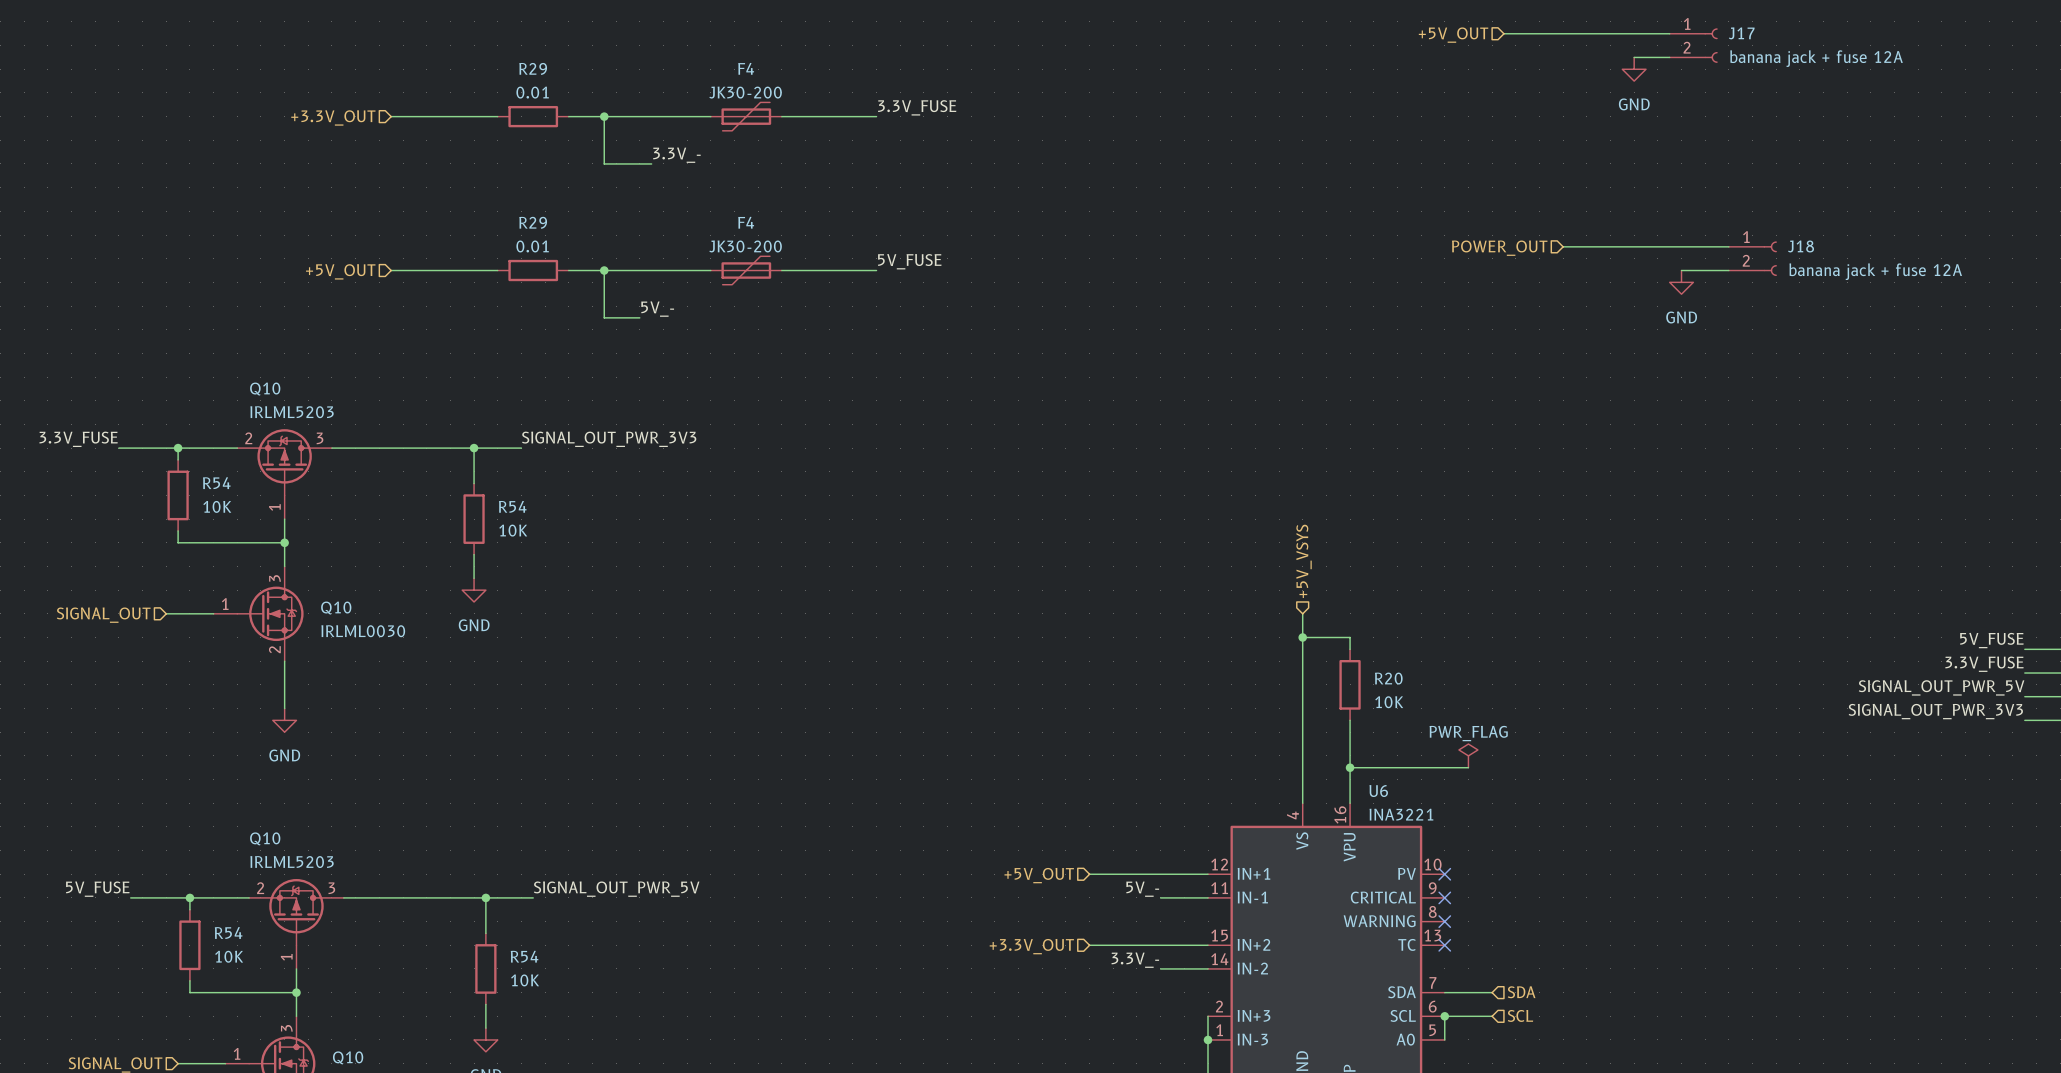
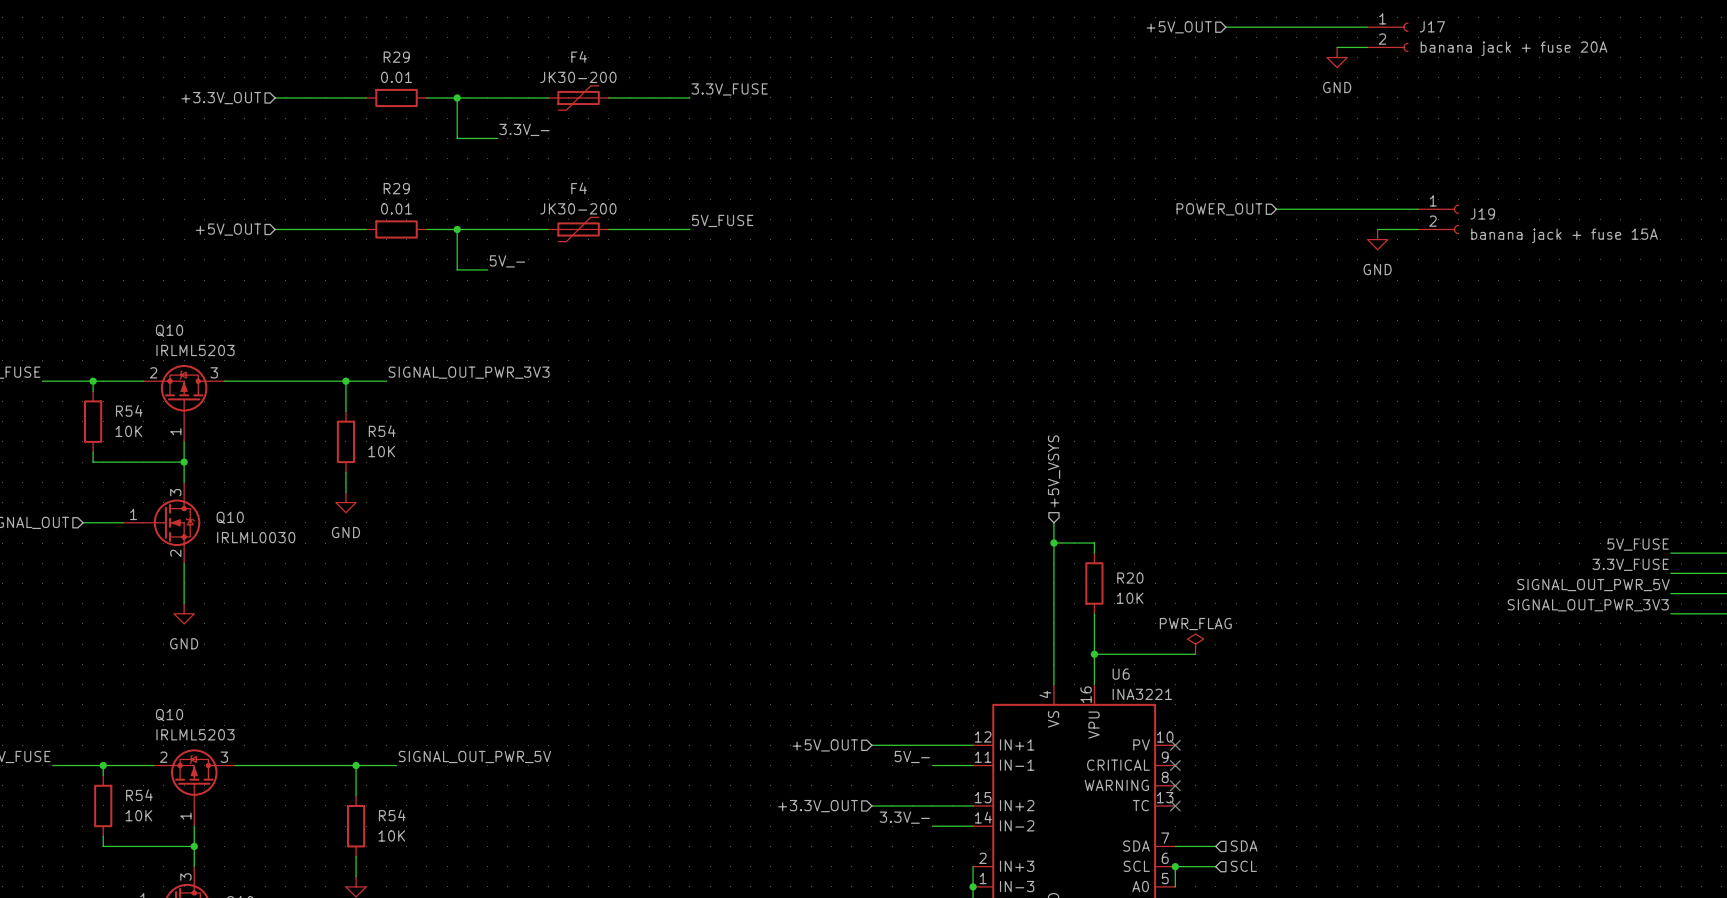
J17 value: banana jack + fuse 12A (1816, 58) -> banana jack + fuse 20A (1513, 48)
J18 name: J18 (1801, 246) -> J19 (1482, 213)
J18 value: banana jack + fuse 12A (1875, 271) -> banana jack + fuse 15A (1564, 235)

